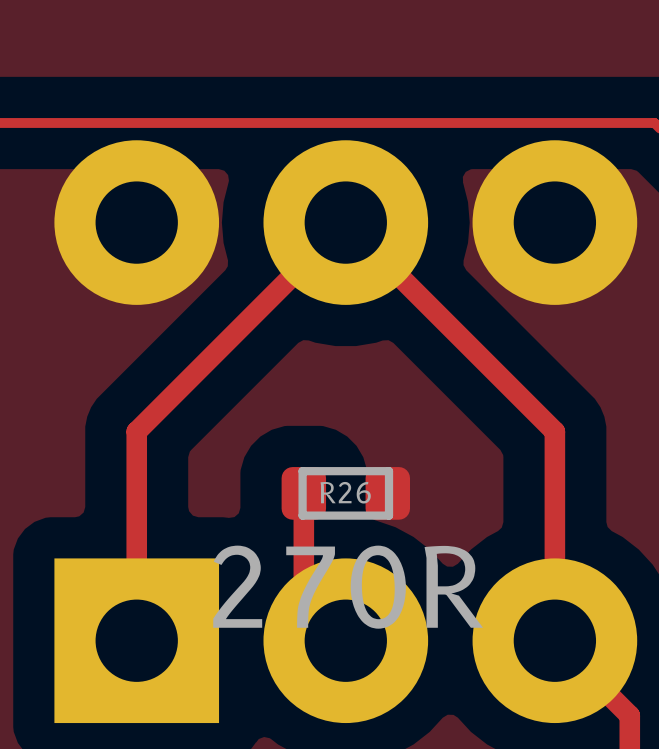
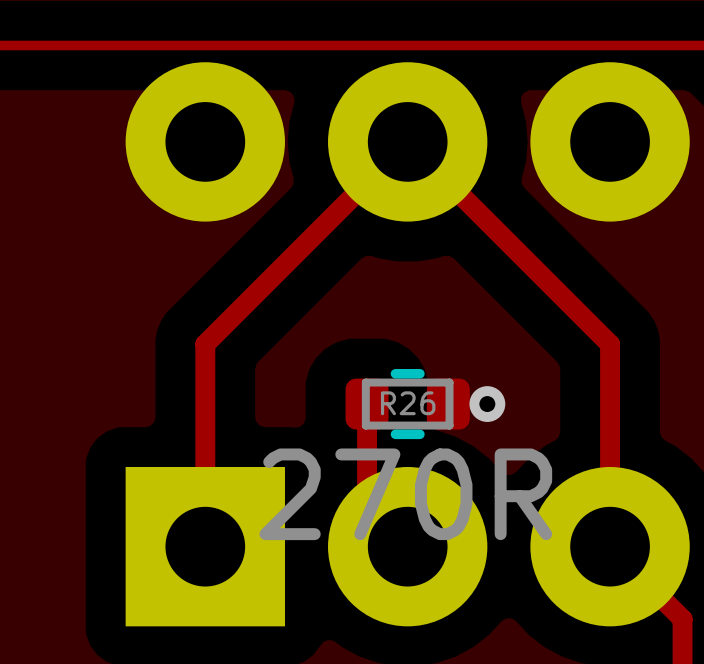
R26 footprint: [281, 467, 411, 520] -> [345, 368, 470, 440]
via: none -> (487, 404)

